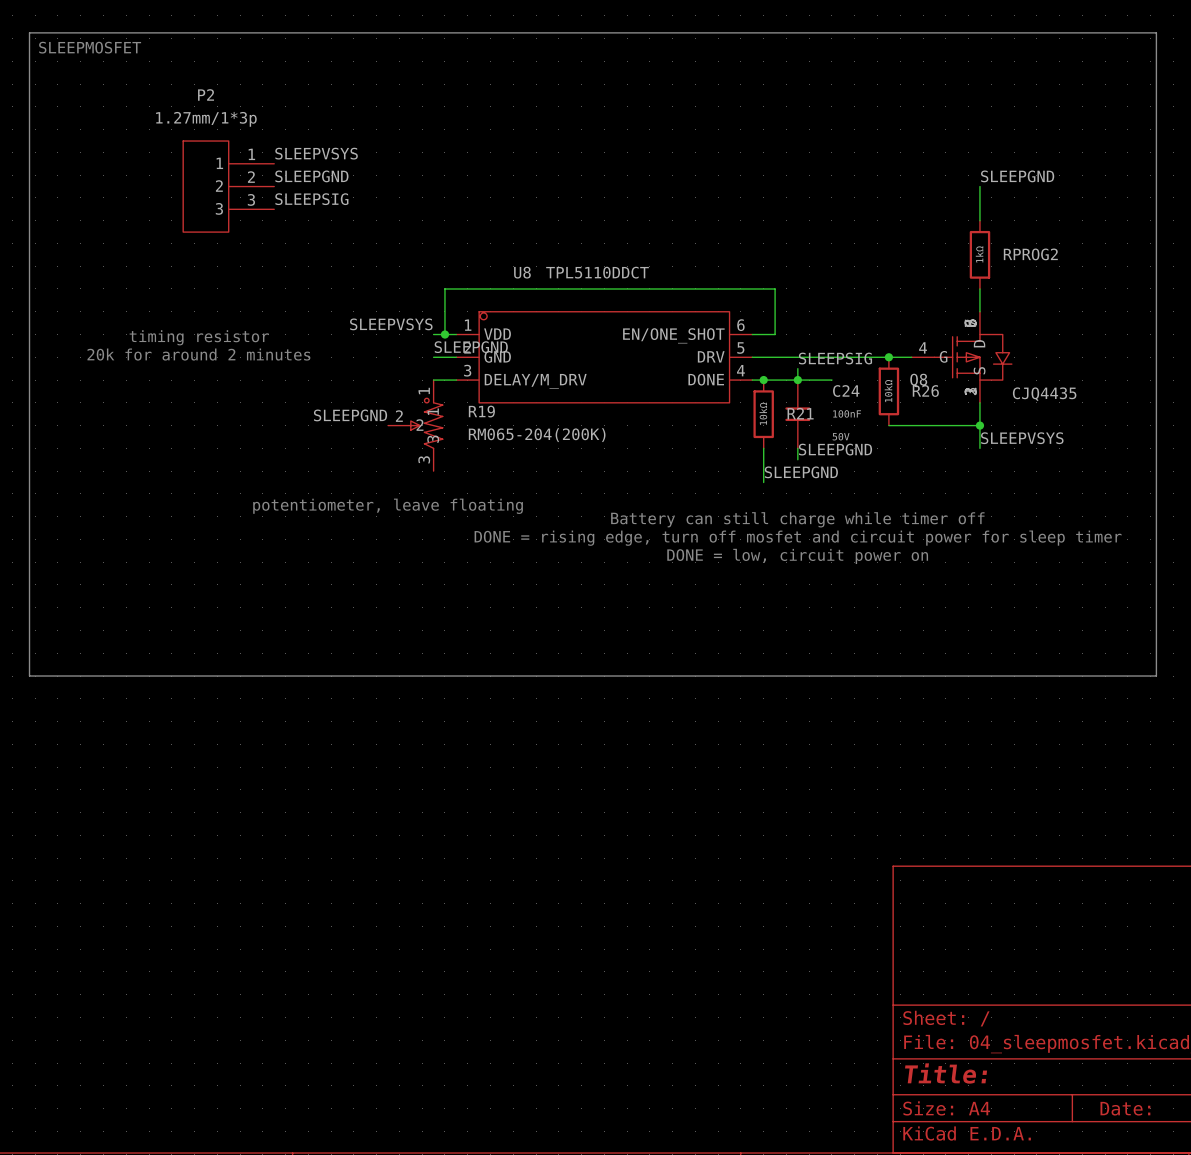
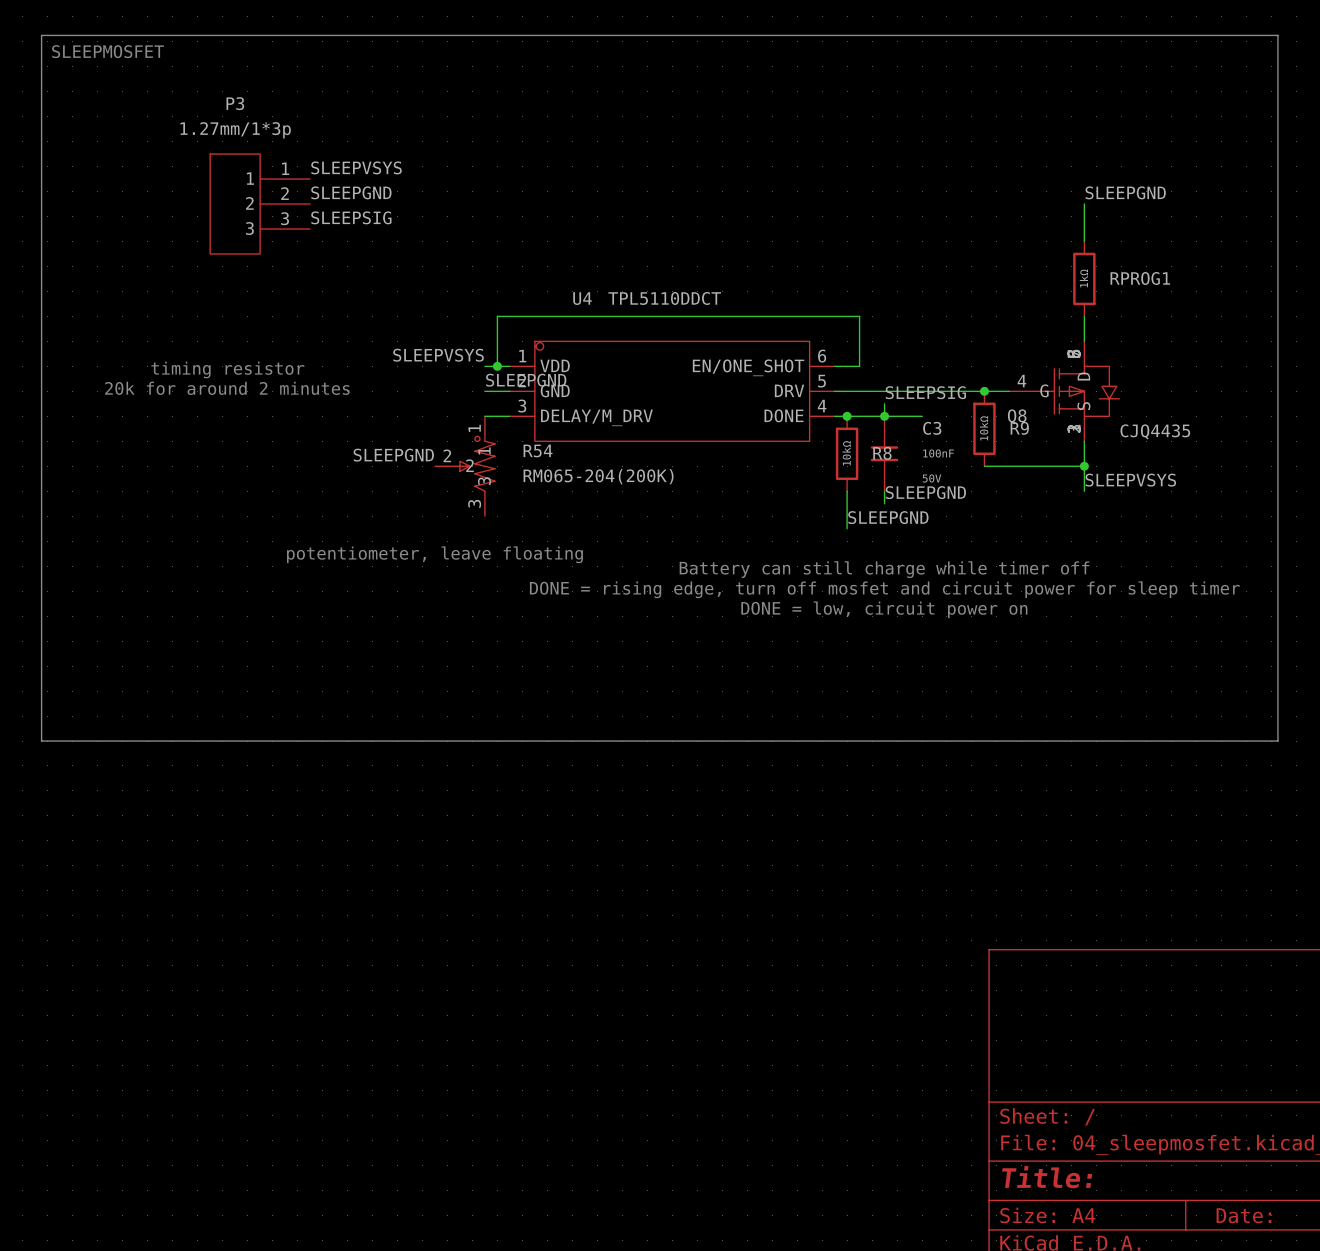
P2 name: P2 (206, 94) -> P3 (235, 103)
RPROG2 name: RPROG2 (1030, 254) -> RPROG1 (1140, 278)
U8 name: U8 (522, 272) -> U4 (582, 298)
C24 name: C24 (846, 391) -> C3 (932, 428)
R26 name: R26 (925, 391) -> R9 (1019, 428)
R19 name: R19 (481, 411) -> R54 (538, 450)
R21 name: R21 (800, 413) -> R8 (882, 453)

